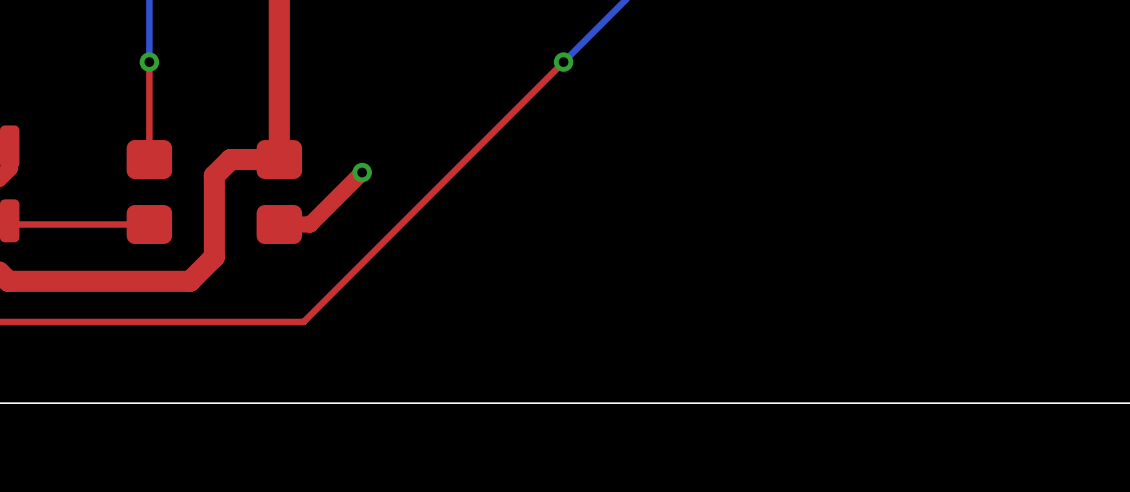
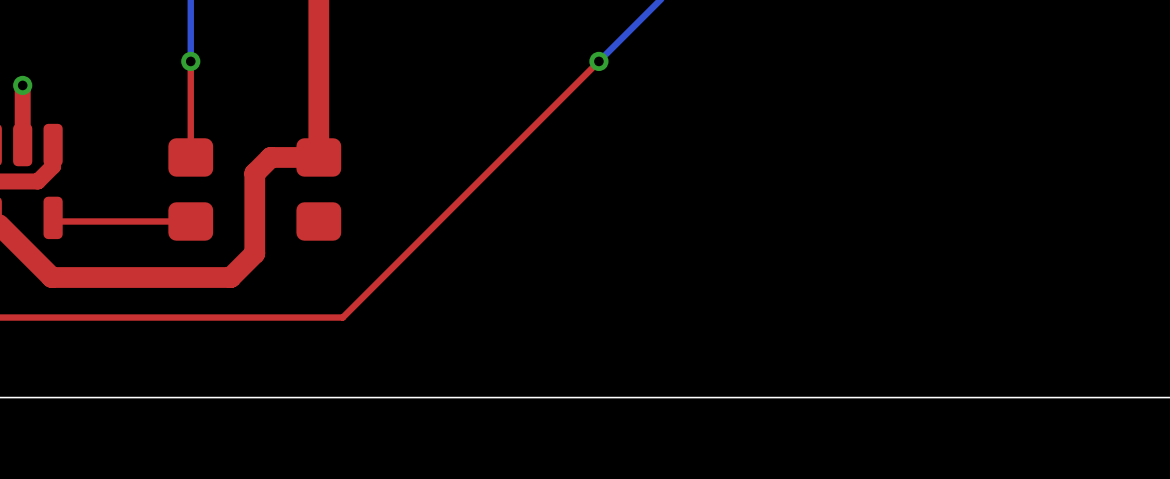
top track: (362, 172) (310, 224) (279, 224) -> none
via: (362, 172) -> none

